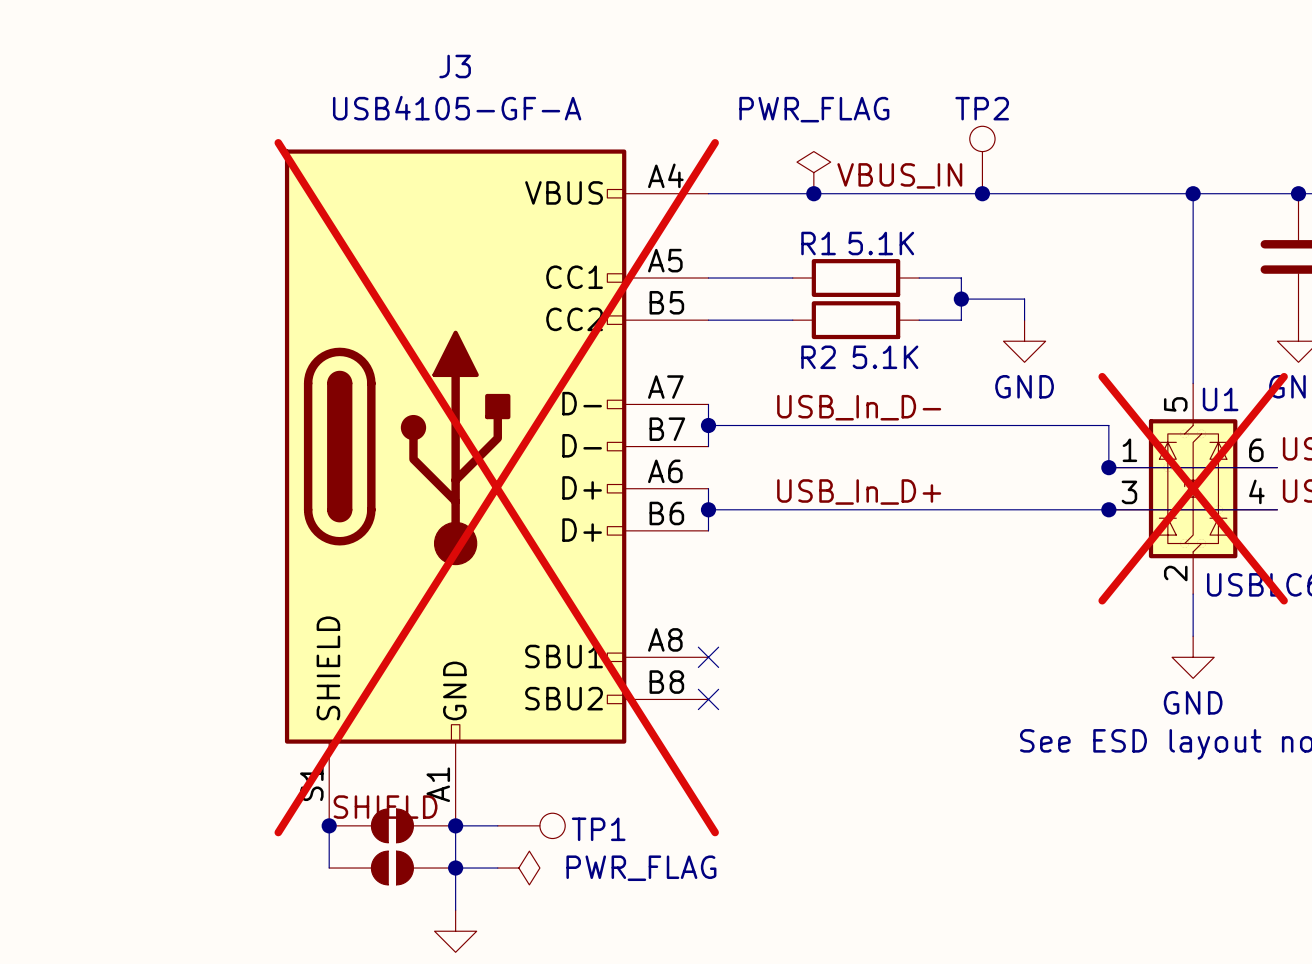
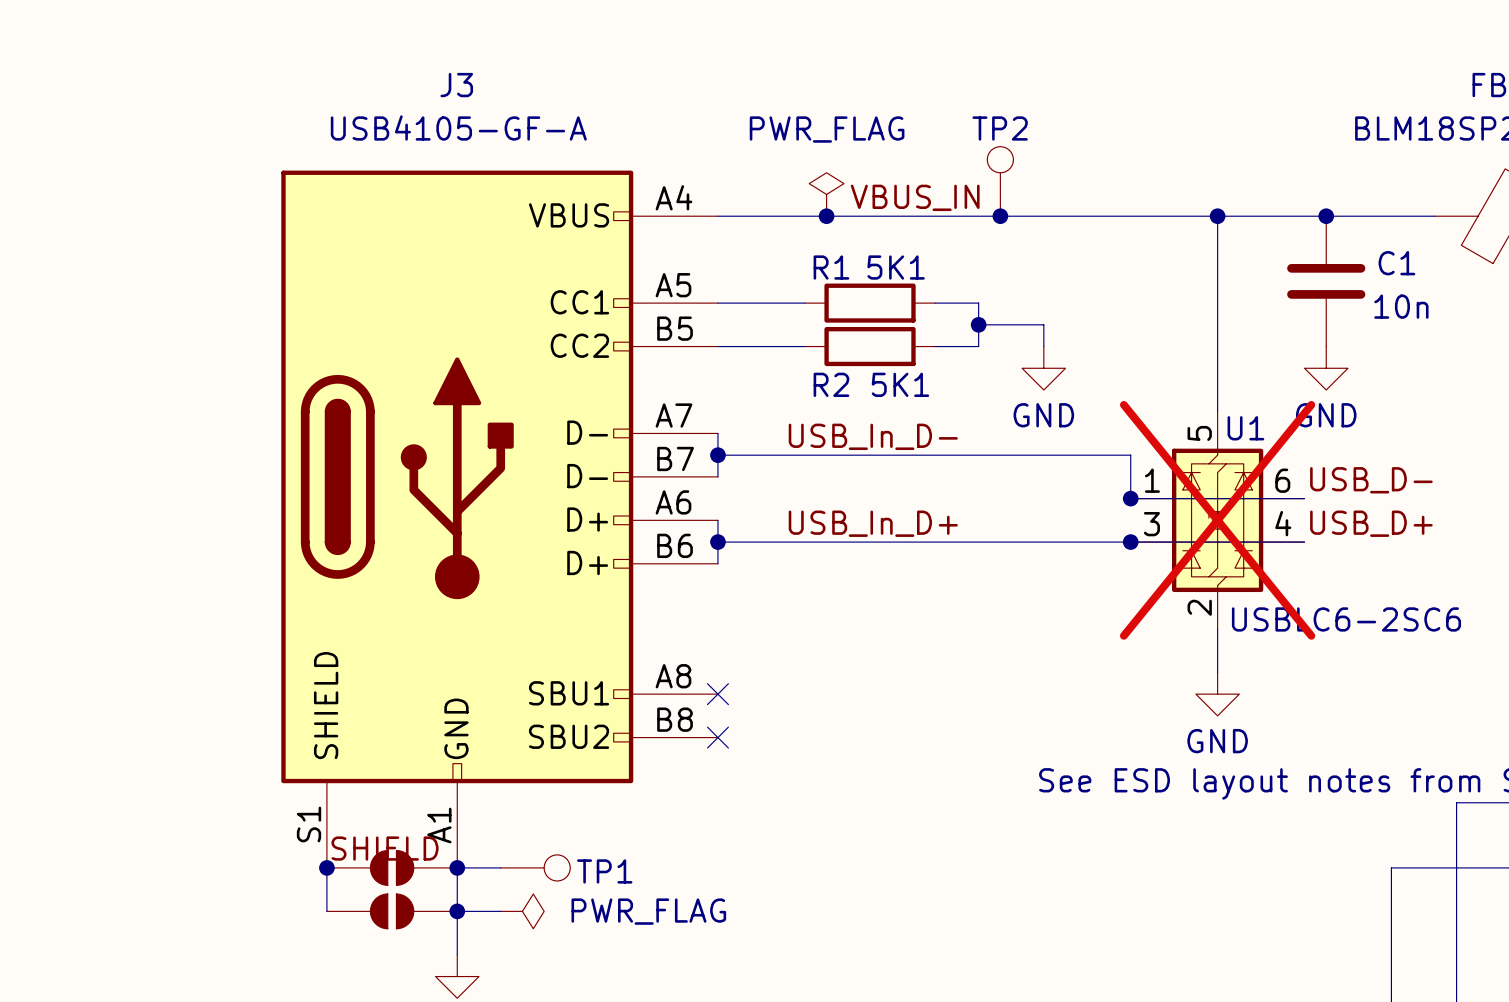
R1 value: 5.1K (881, 243) -> 5K1 (896, 267)
R2 value: 5.1K (885, 357) -> 5K1 (900, 384)
J3 do-not-place cross: (496, 487) -> none

